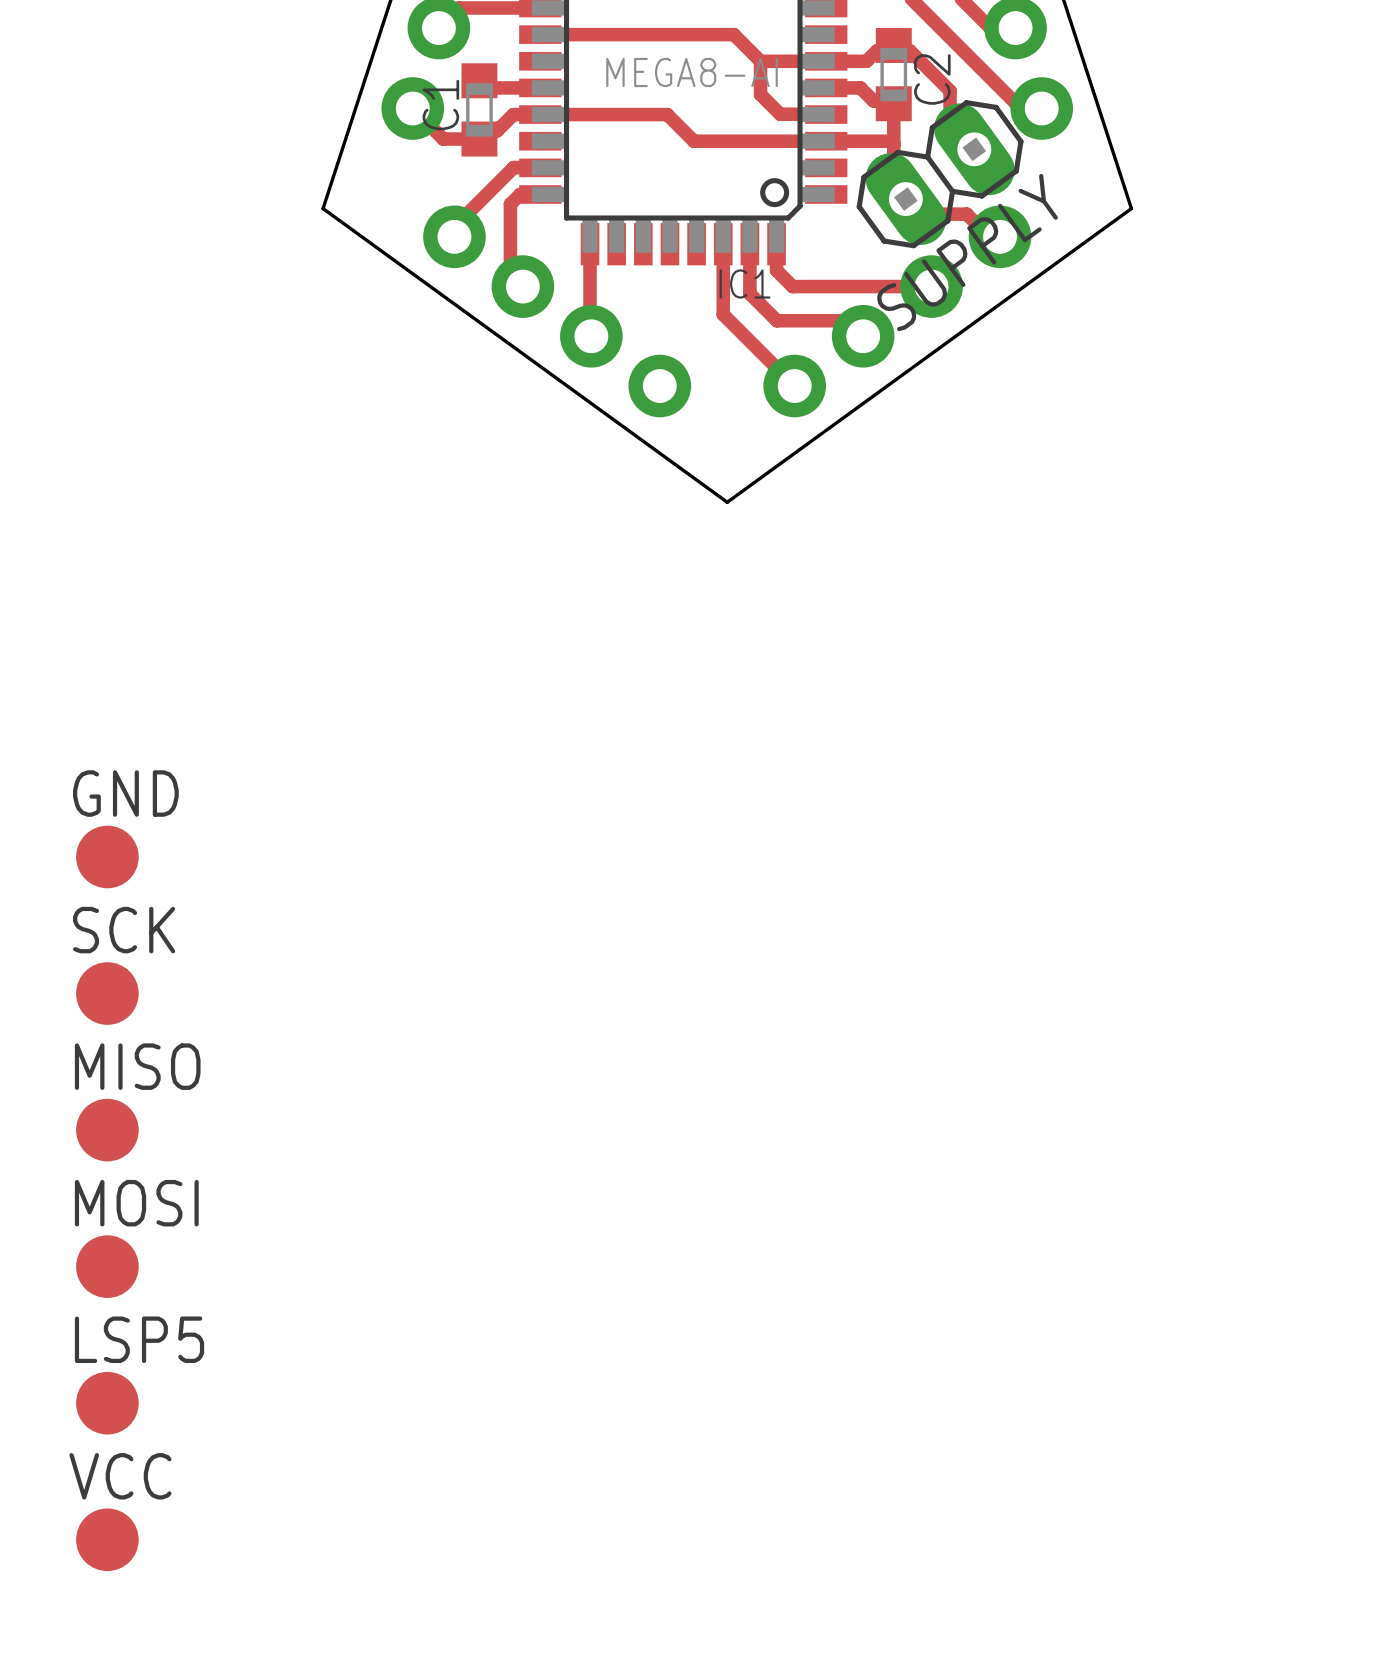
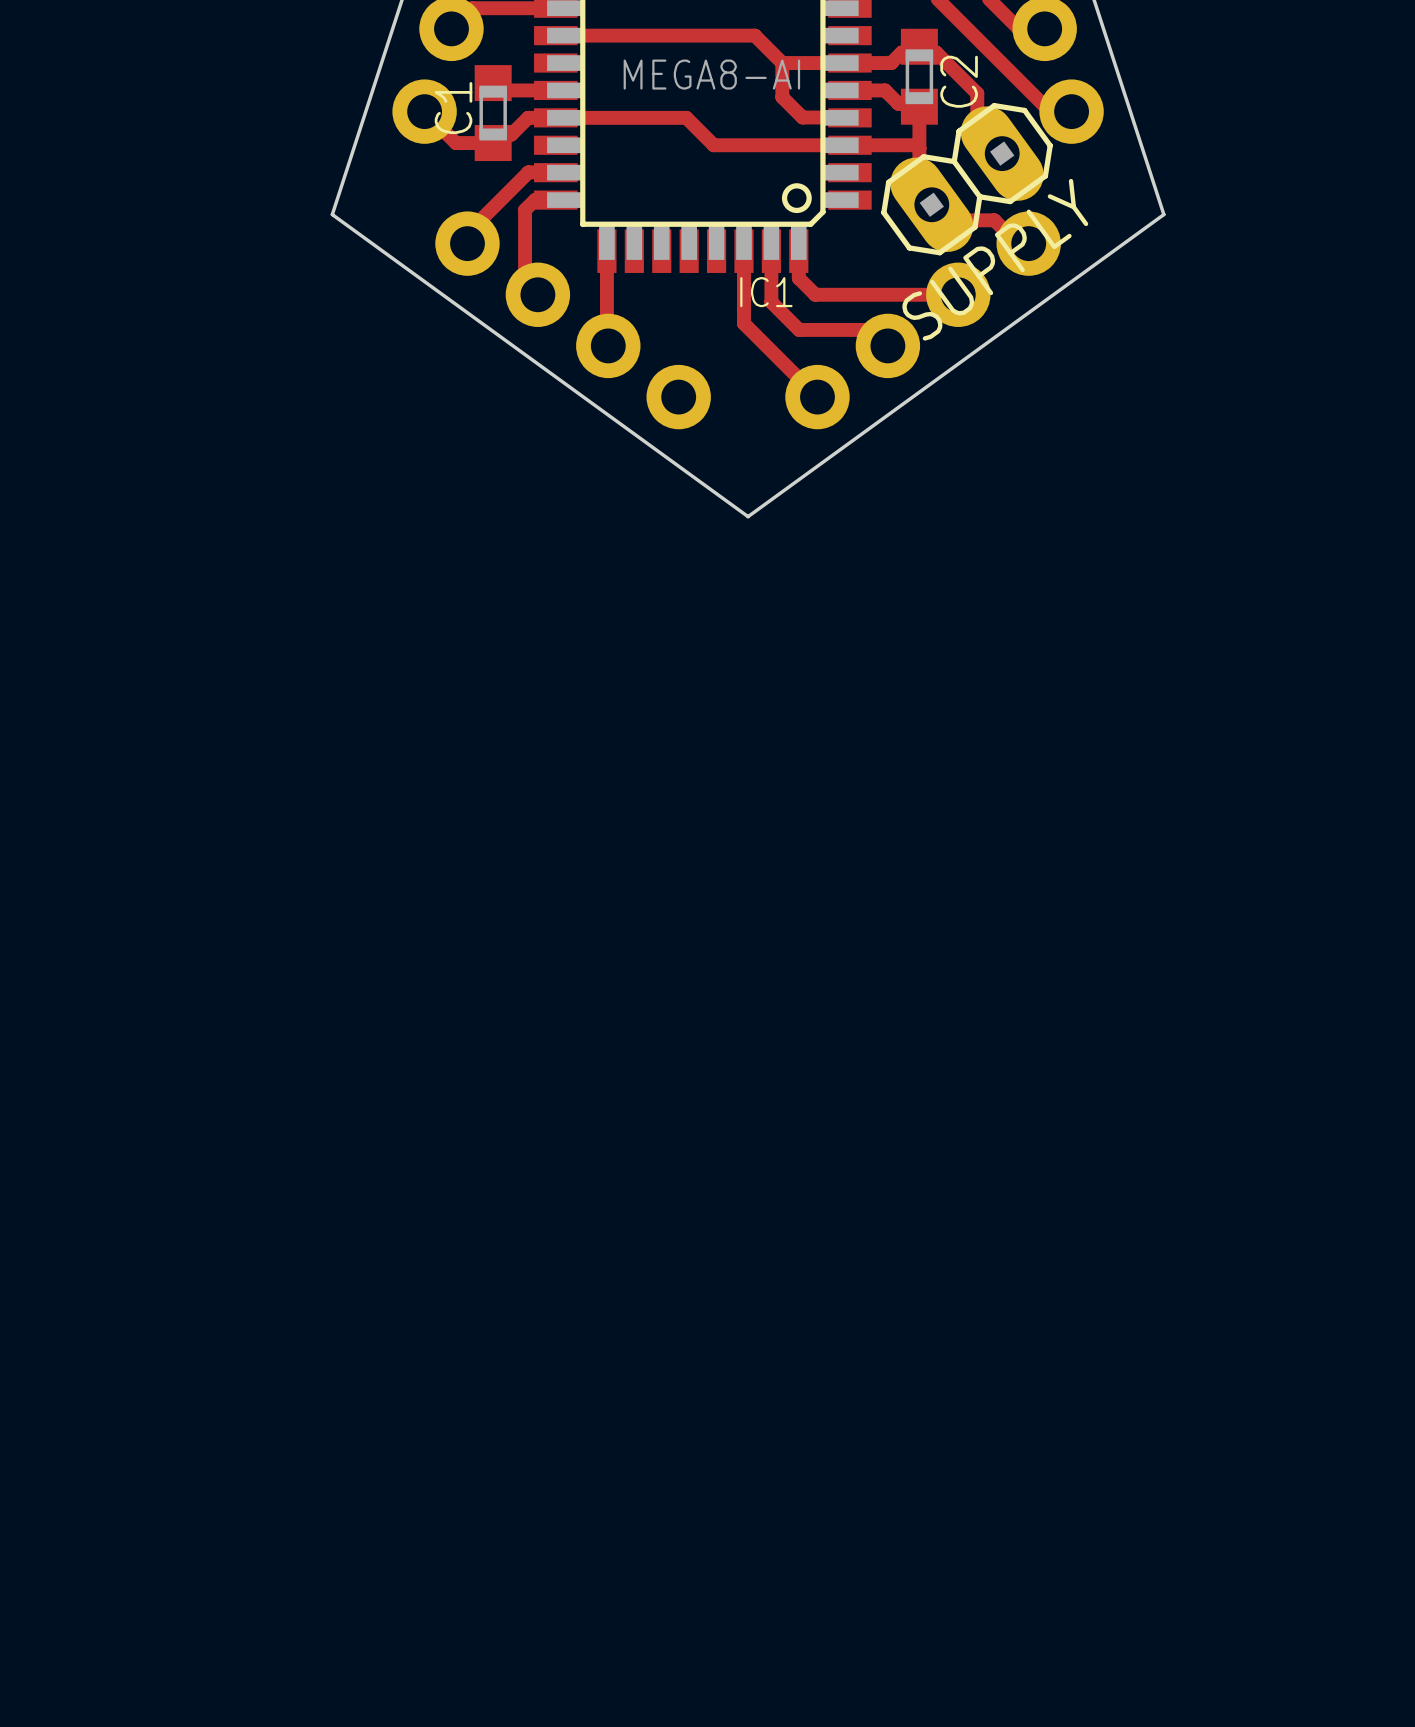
GND: (107, 856) -> none
SCK: (107, 993) -> none
MISO: (107, 1130) -> none
MOSI: (107, 1266) -> none
LSP5: (107, 1403) -> none
VCC: (107, 1539) -> none

